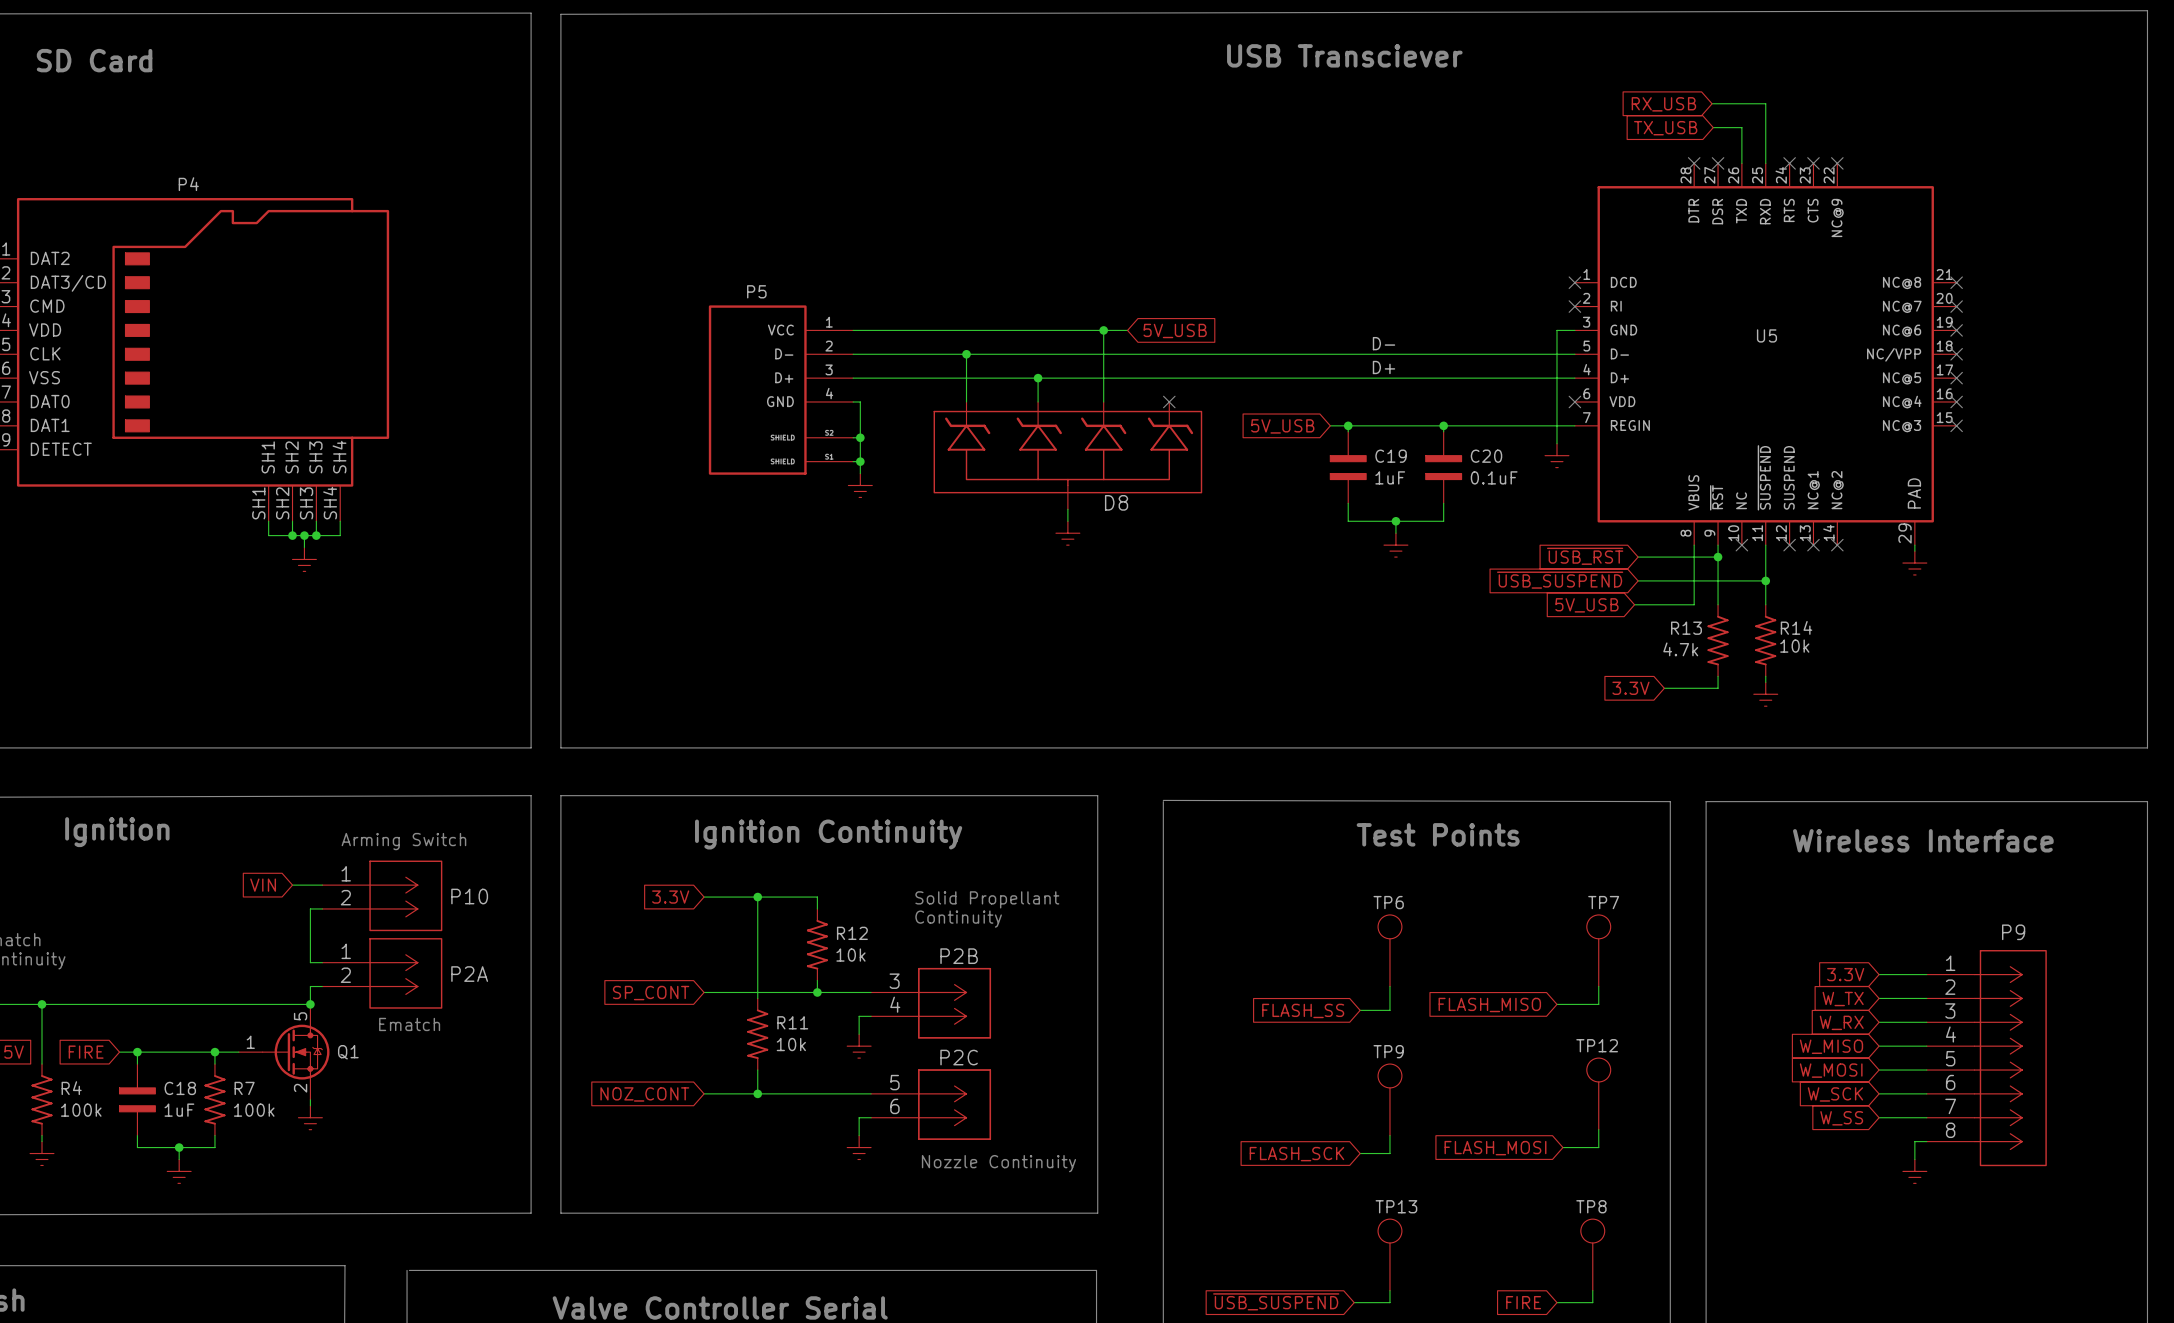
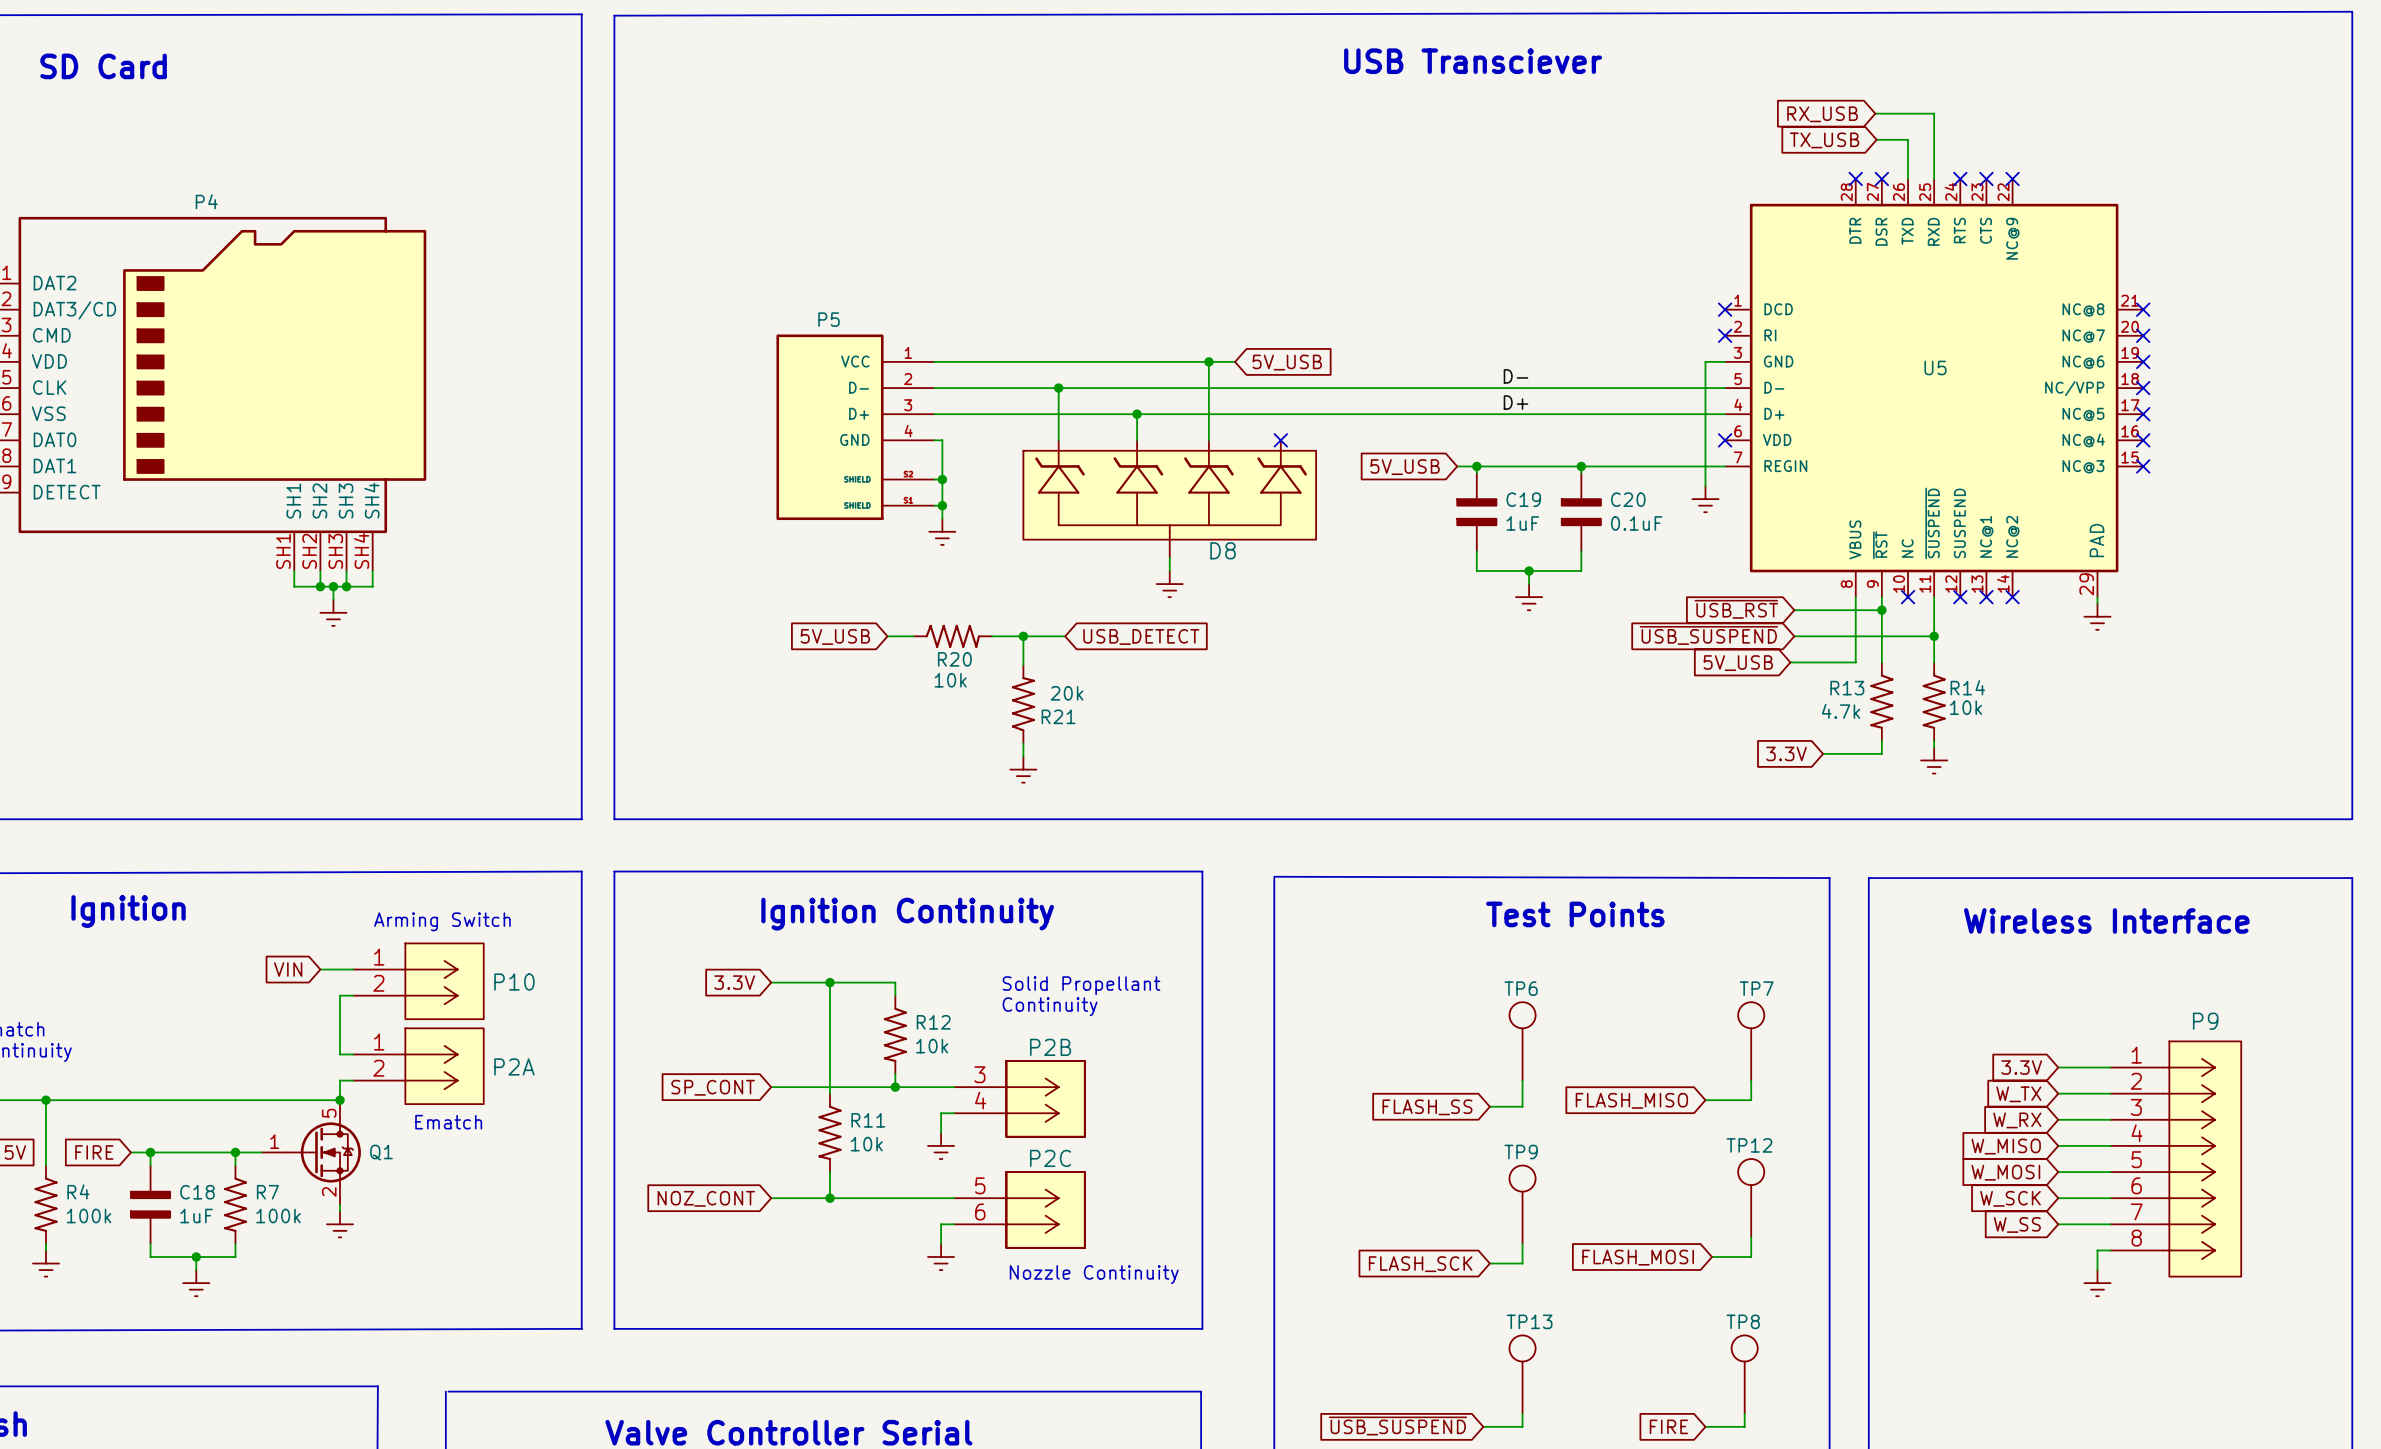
wire: none -> (887, 636) (913, 636)
R20: none -> 10k (952, 636)
wire: none -> (992, 636) (1065, 636)
wire: none -> (1023, 636) (1023, 665)
junction: none -> (1023, 636)
global label: none -> 5V_USB (835, 636)
global label: none -> USB_DETECT (1141, 636)
R21: none -> 20k (1023, 704)
wire: none -> (1023, 743) (1023, 756)
power symbol: none -> (1023, 769)

